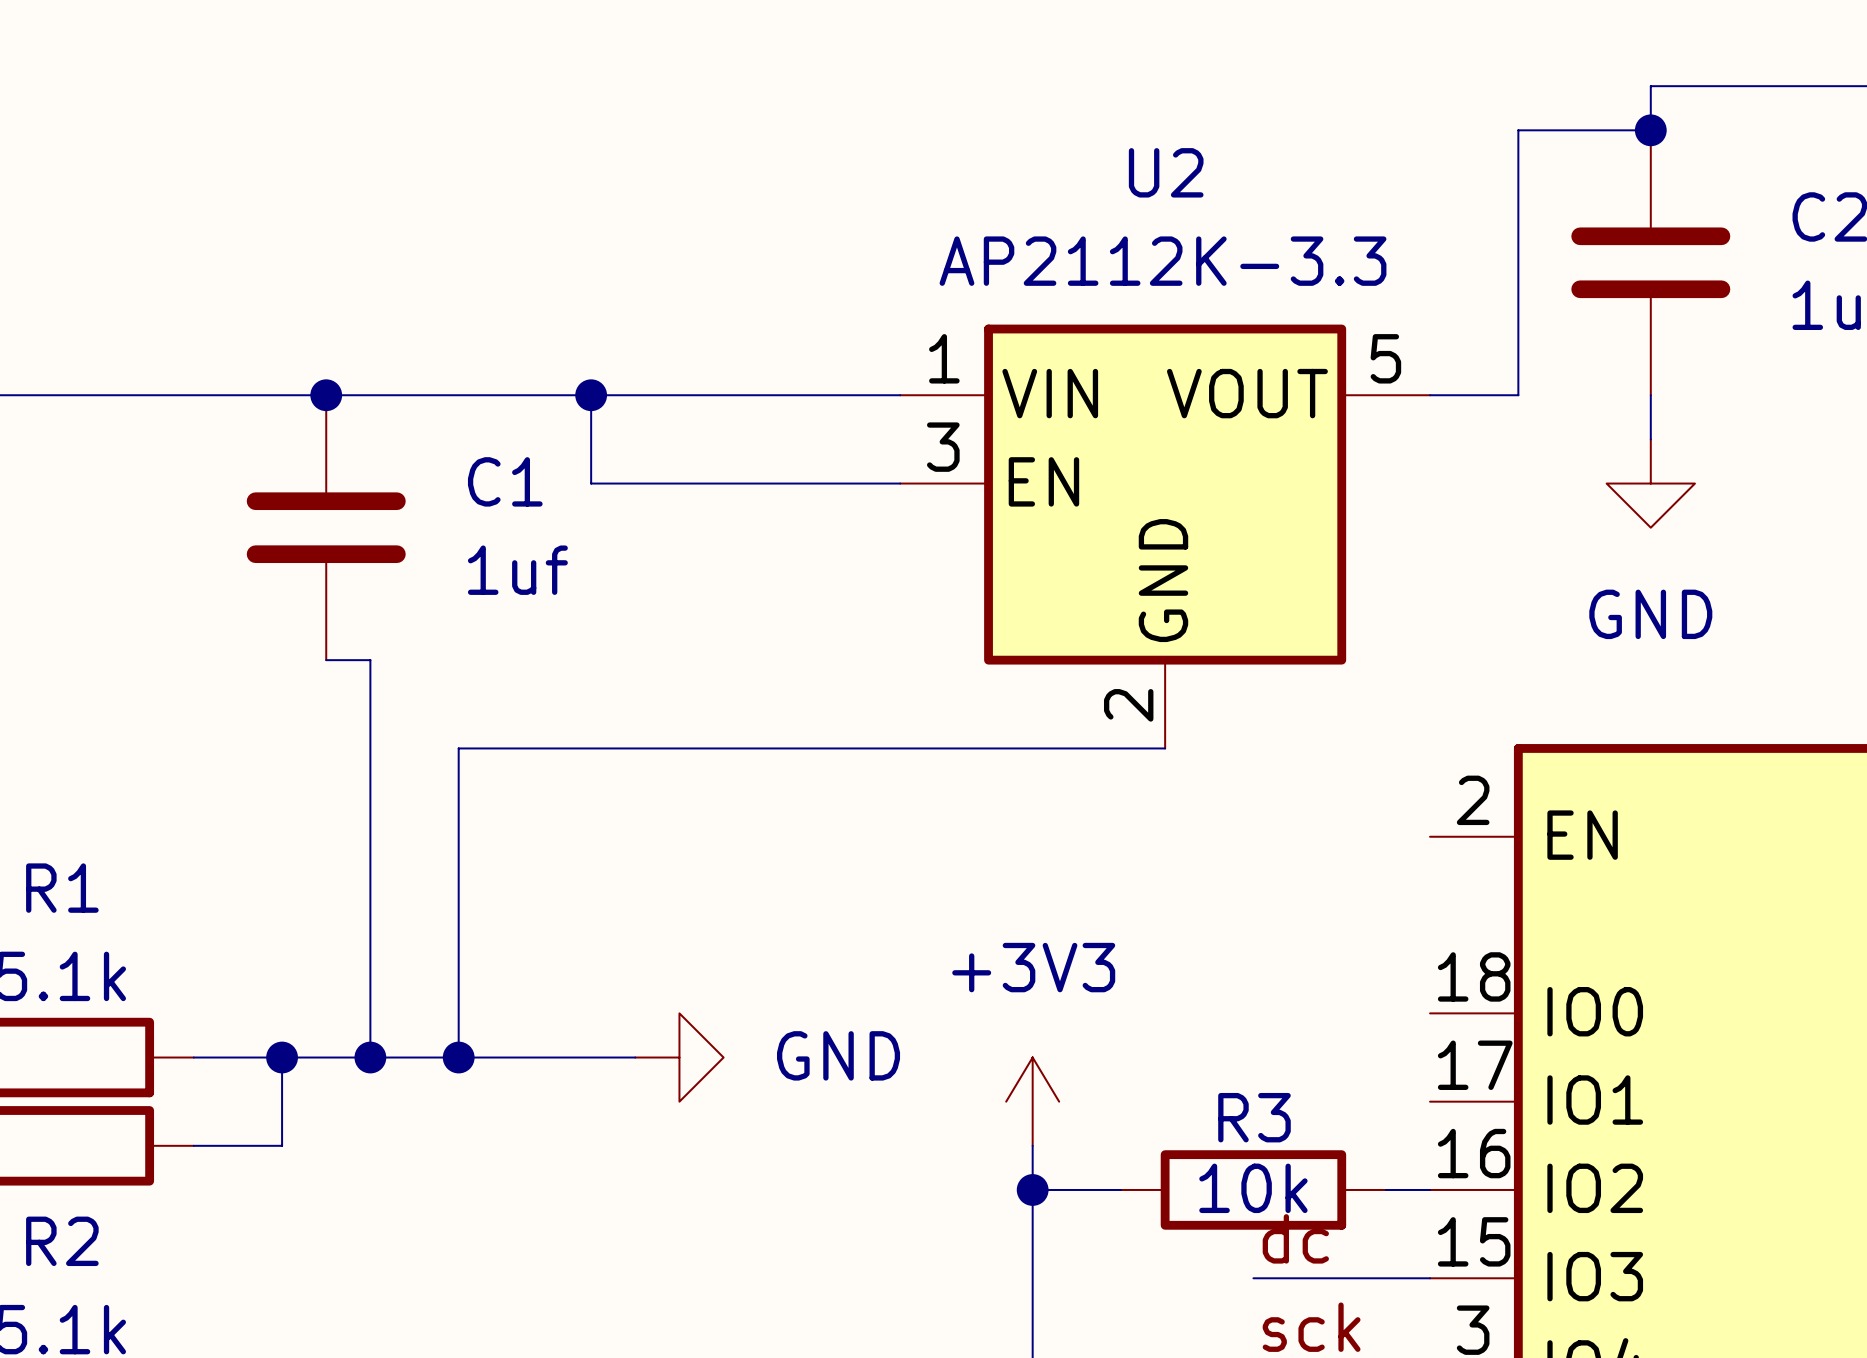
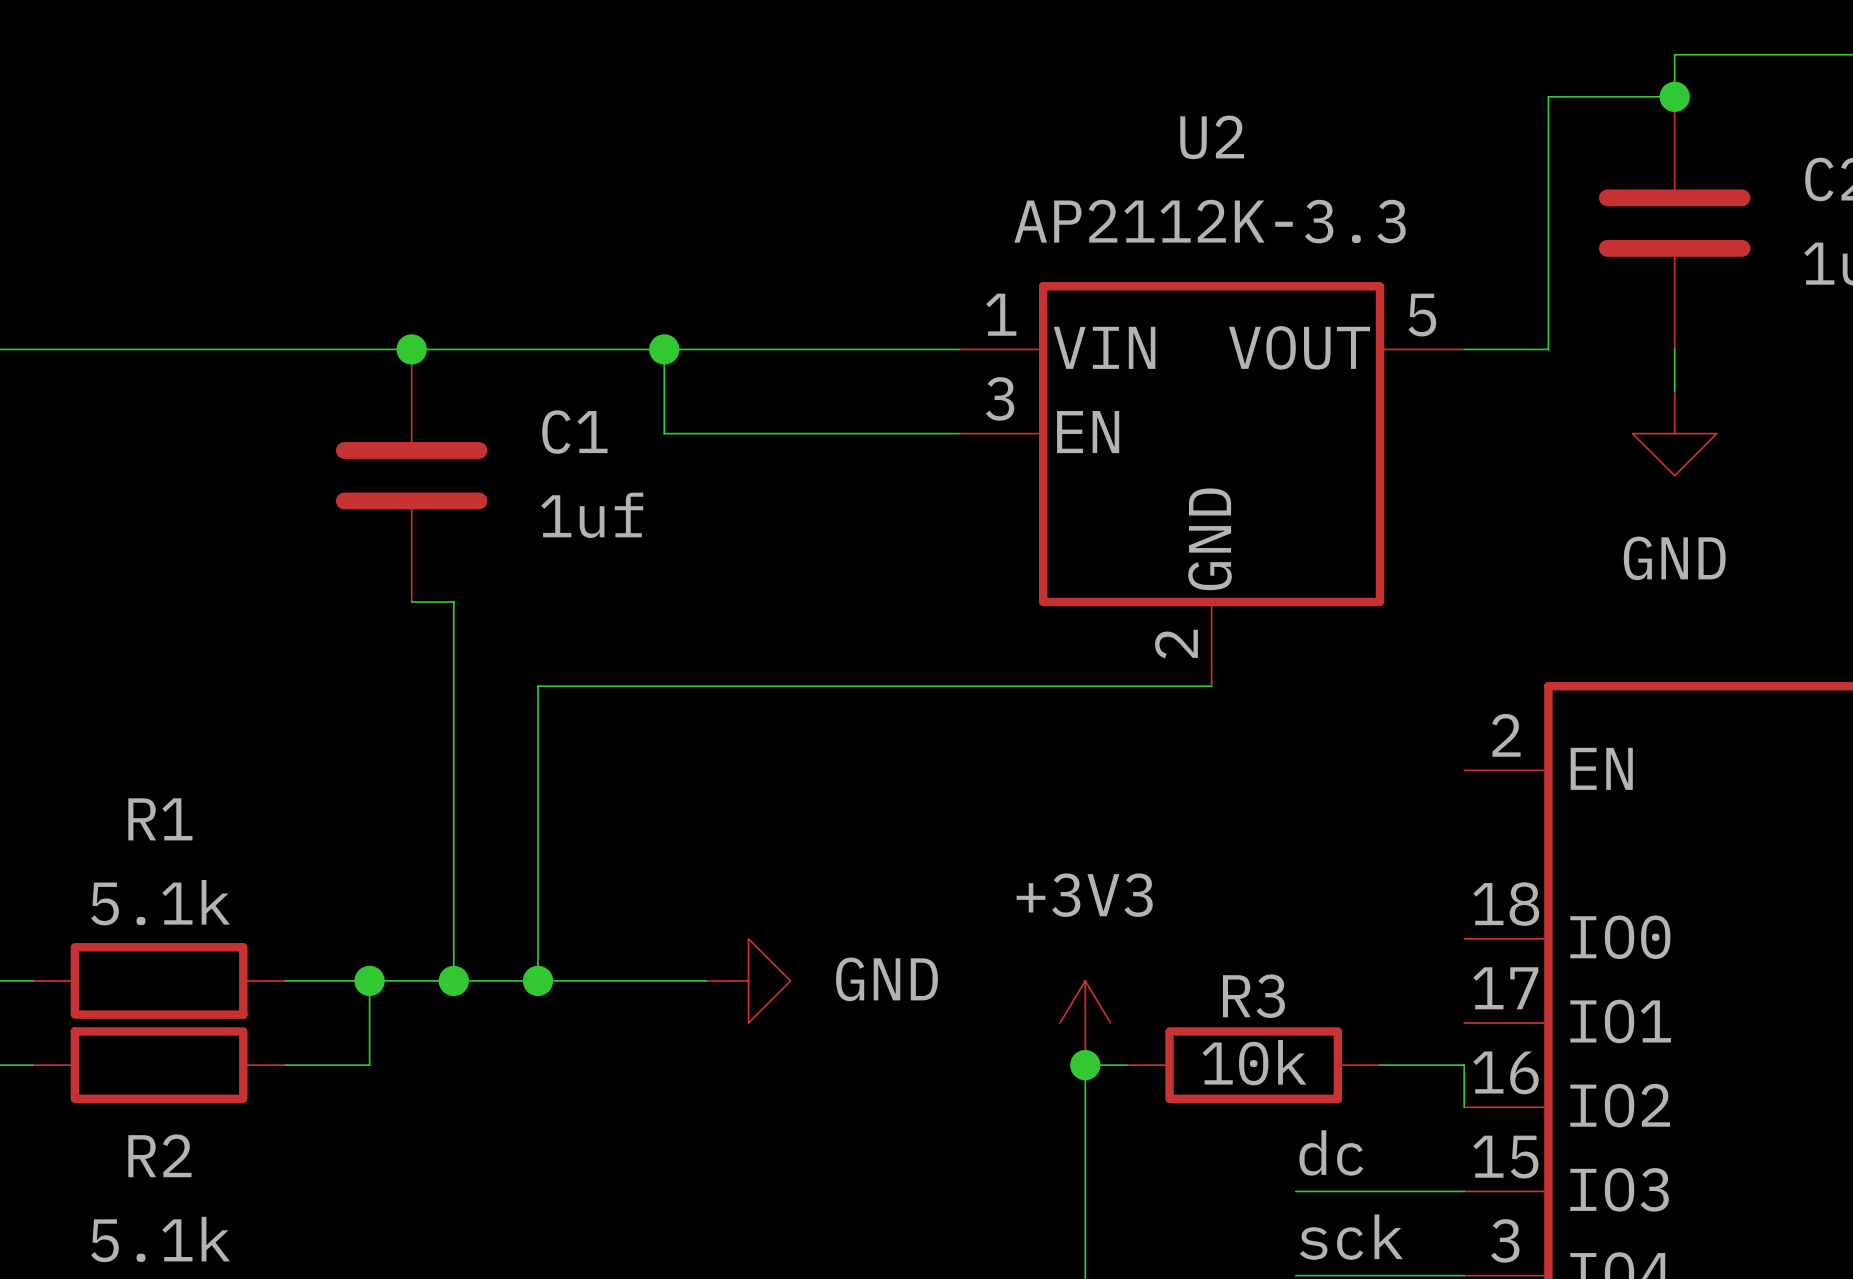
wire: none -> (1085, 1065) (1127, 1065)
wire: (1032, 1189) (1120, 1189) -> none
junction position: (1032, 1189) -> (1085, 1065)
R3 position: (1253, 1189) -> (1253, 1065)
wire: (1385, 1189) (1430, 1189) -> (1380, 1065) (1464, 1065) (1464, 1107)

